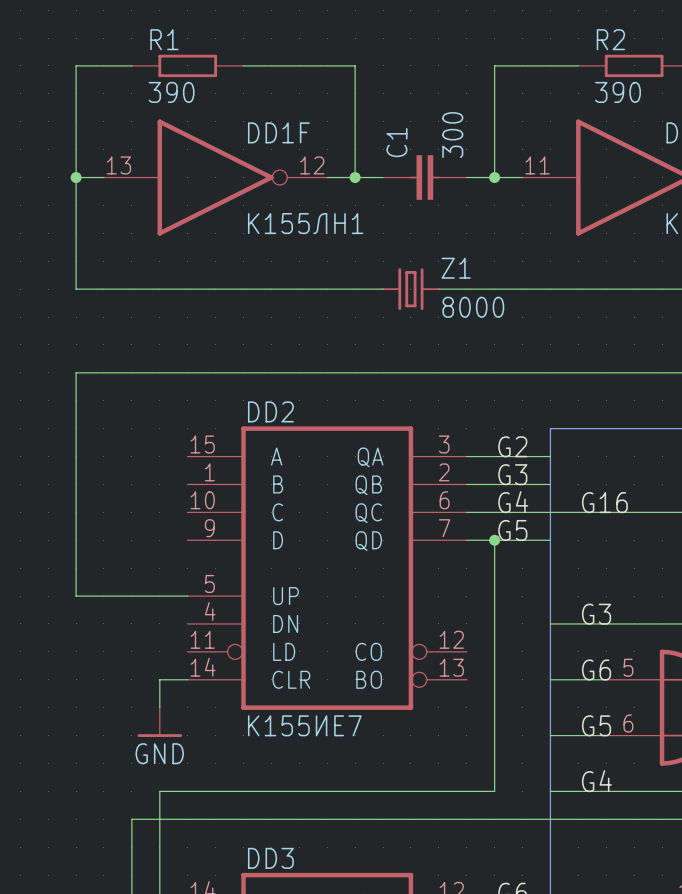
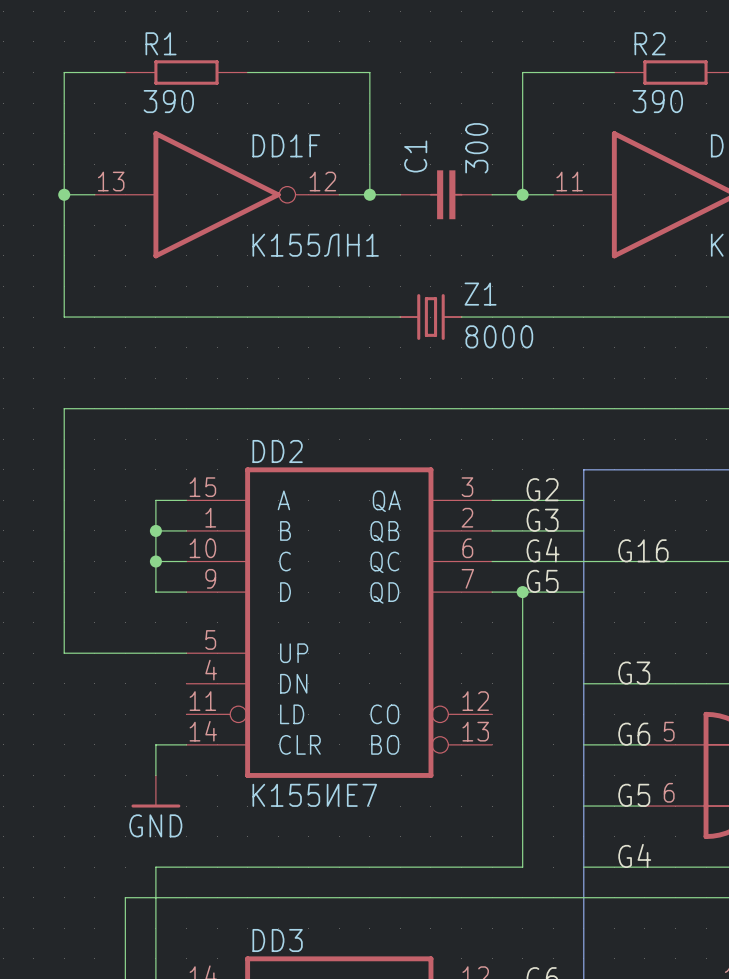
wire: none -> (186, 500) (155, 500) (155, 592) (186, 592)
wire: none -> (155, 530) (186, 530)
junction: none -> (155, 530)
wire: none -> (155, 561) (186, 561)
junction: none -> (155, 561)

